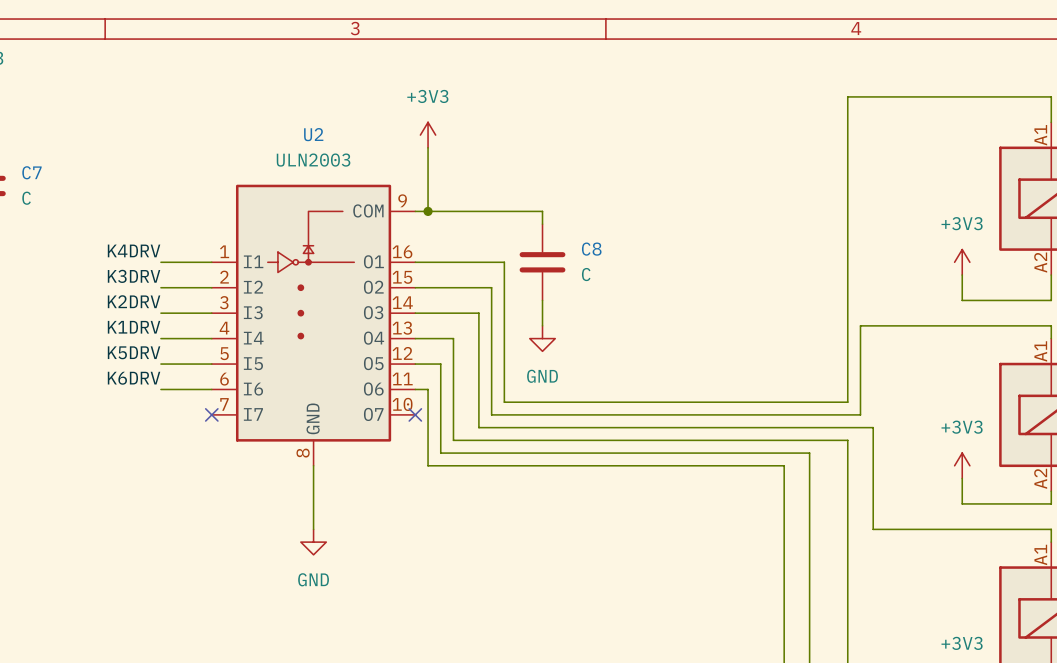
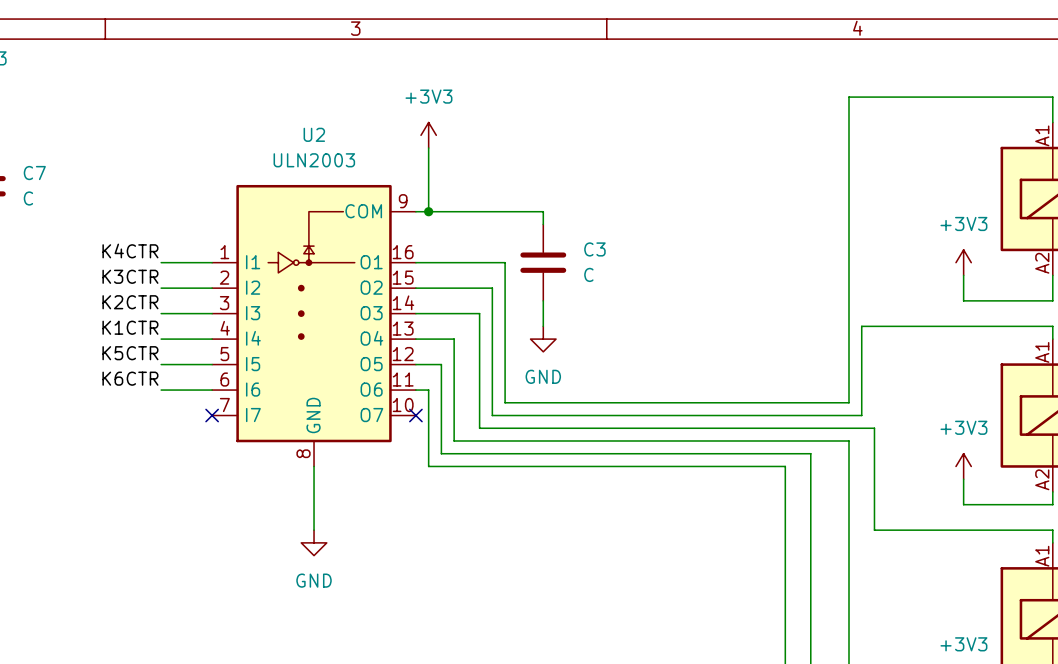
C8 name: C8 (591, 249) -> C3 (594, 249)
label: K4DRV (134, 250) -> K4CTR (130, 250)
label: K3DRV (134, 276) -> K3CTR (130, 276)
label: K2DRV (134, 301) -> K2CTR (130, 302)
label: K1DRV (134, 327) -> K1CTR (130, 327)
label: K5DRV (134, 352) -> K5CTR (130, 353)
label: K6DRV (134, 378) -> K6CTR (130, 378)

